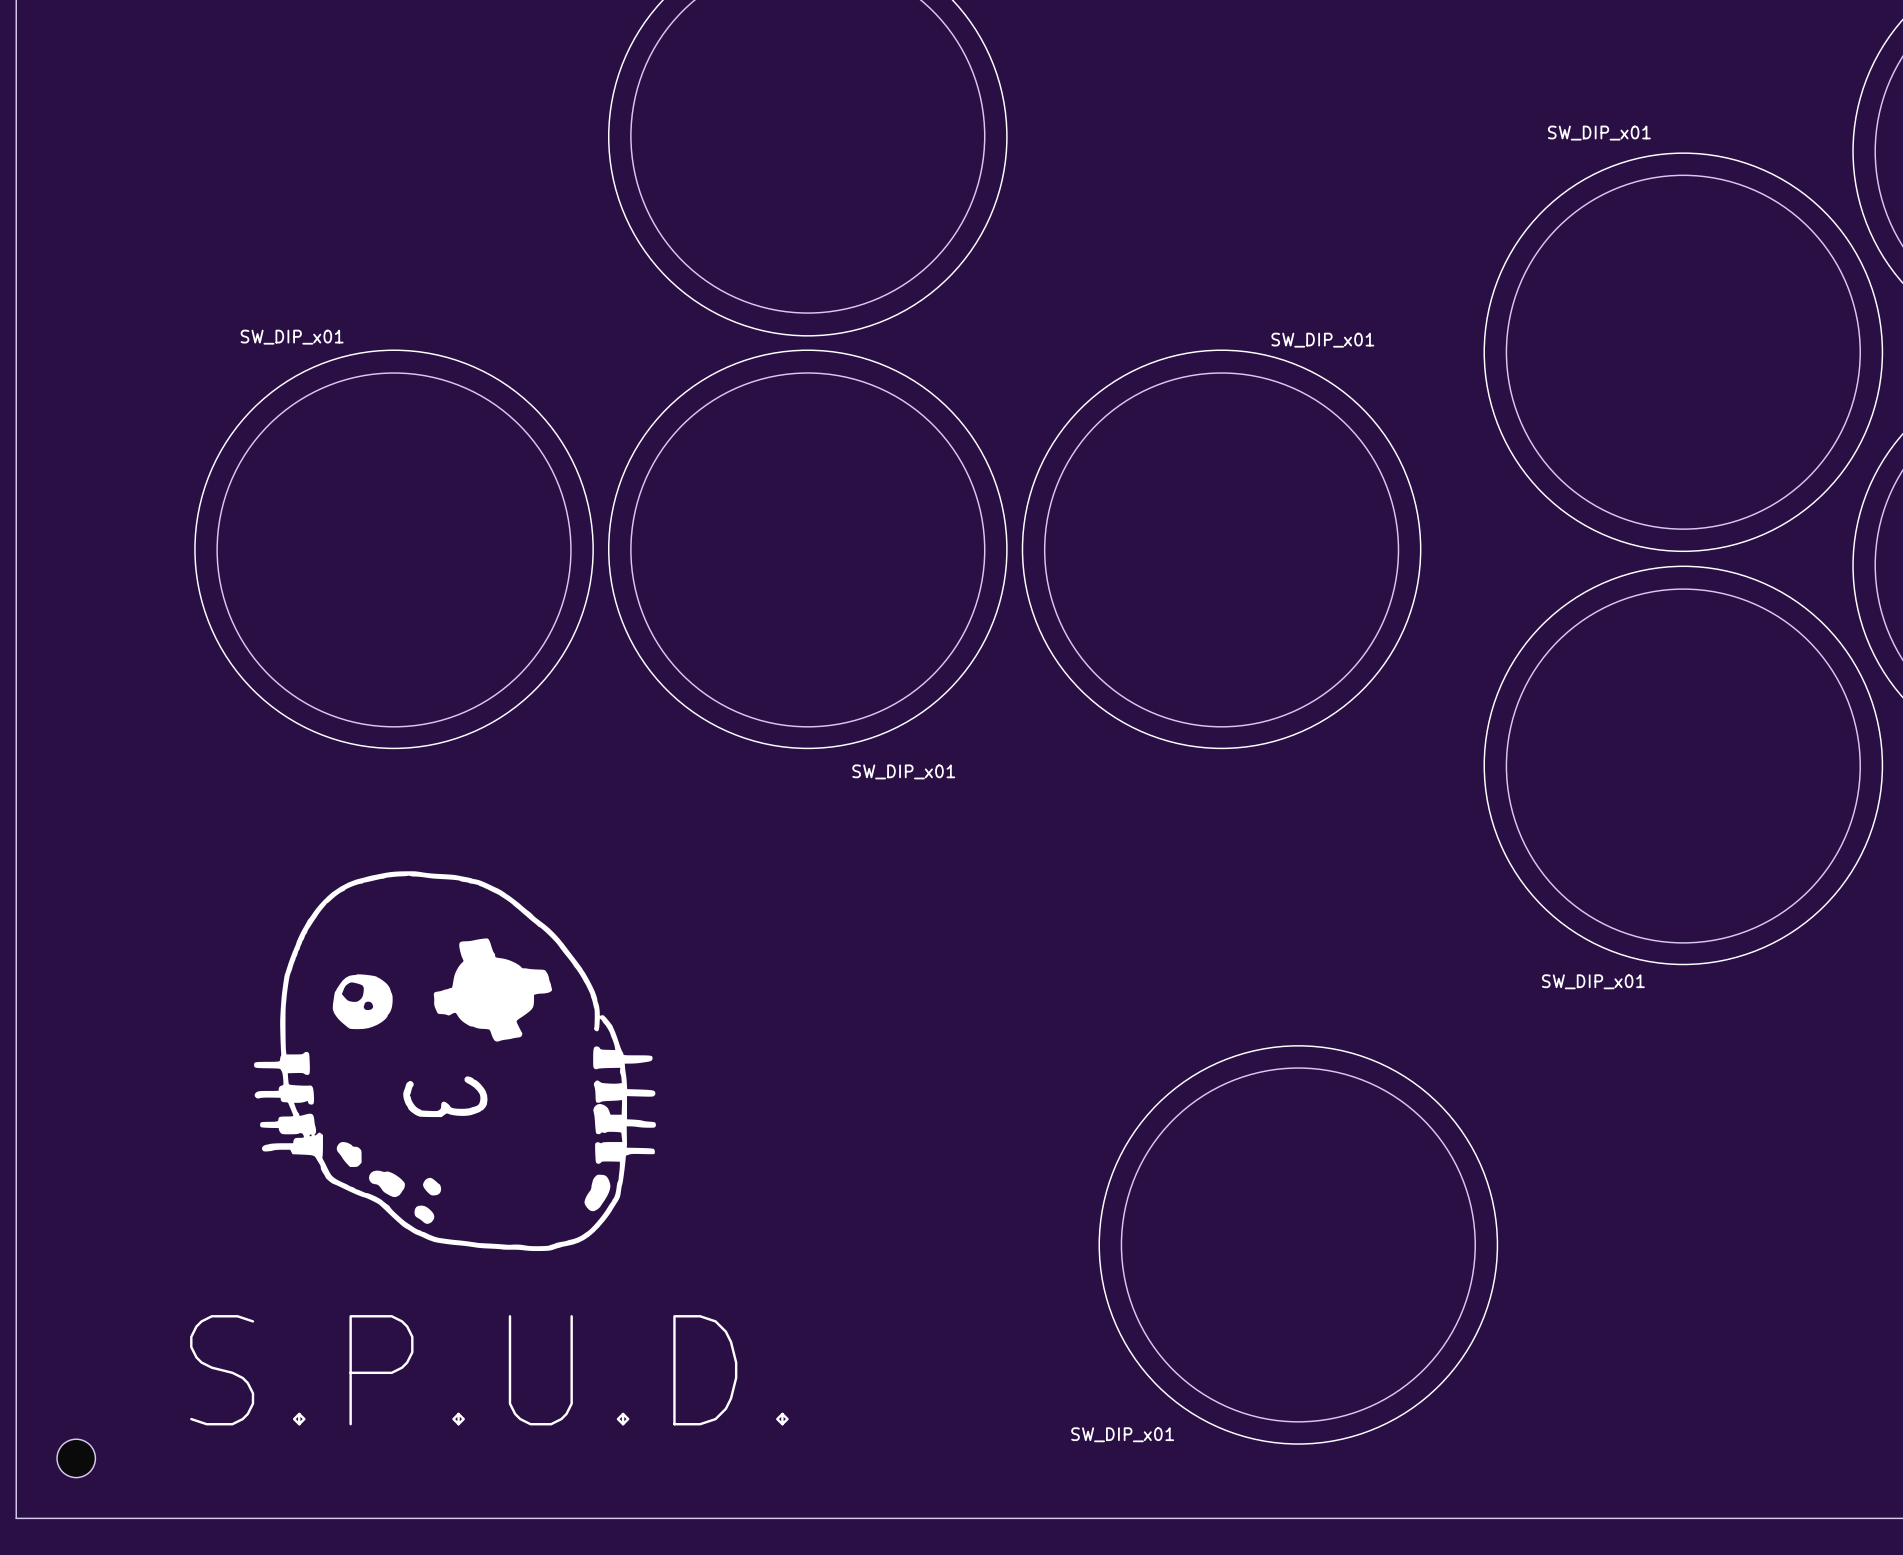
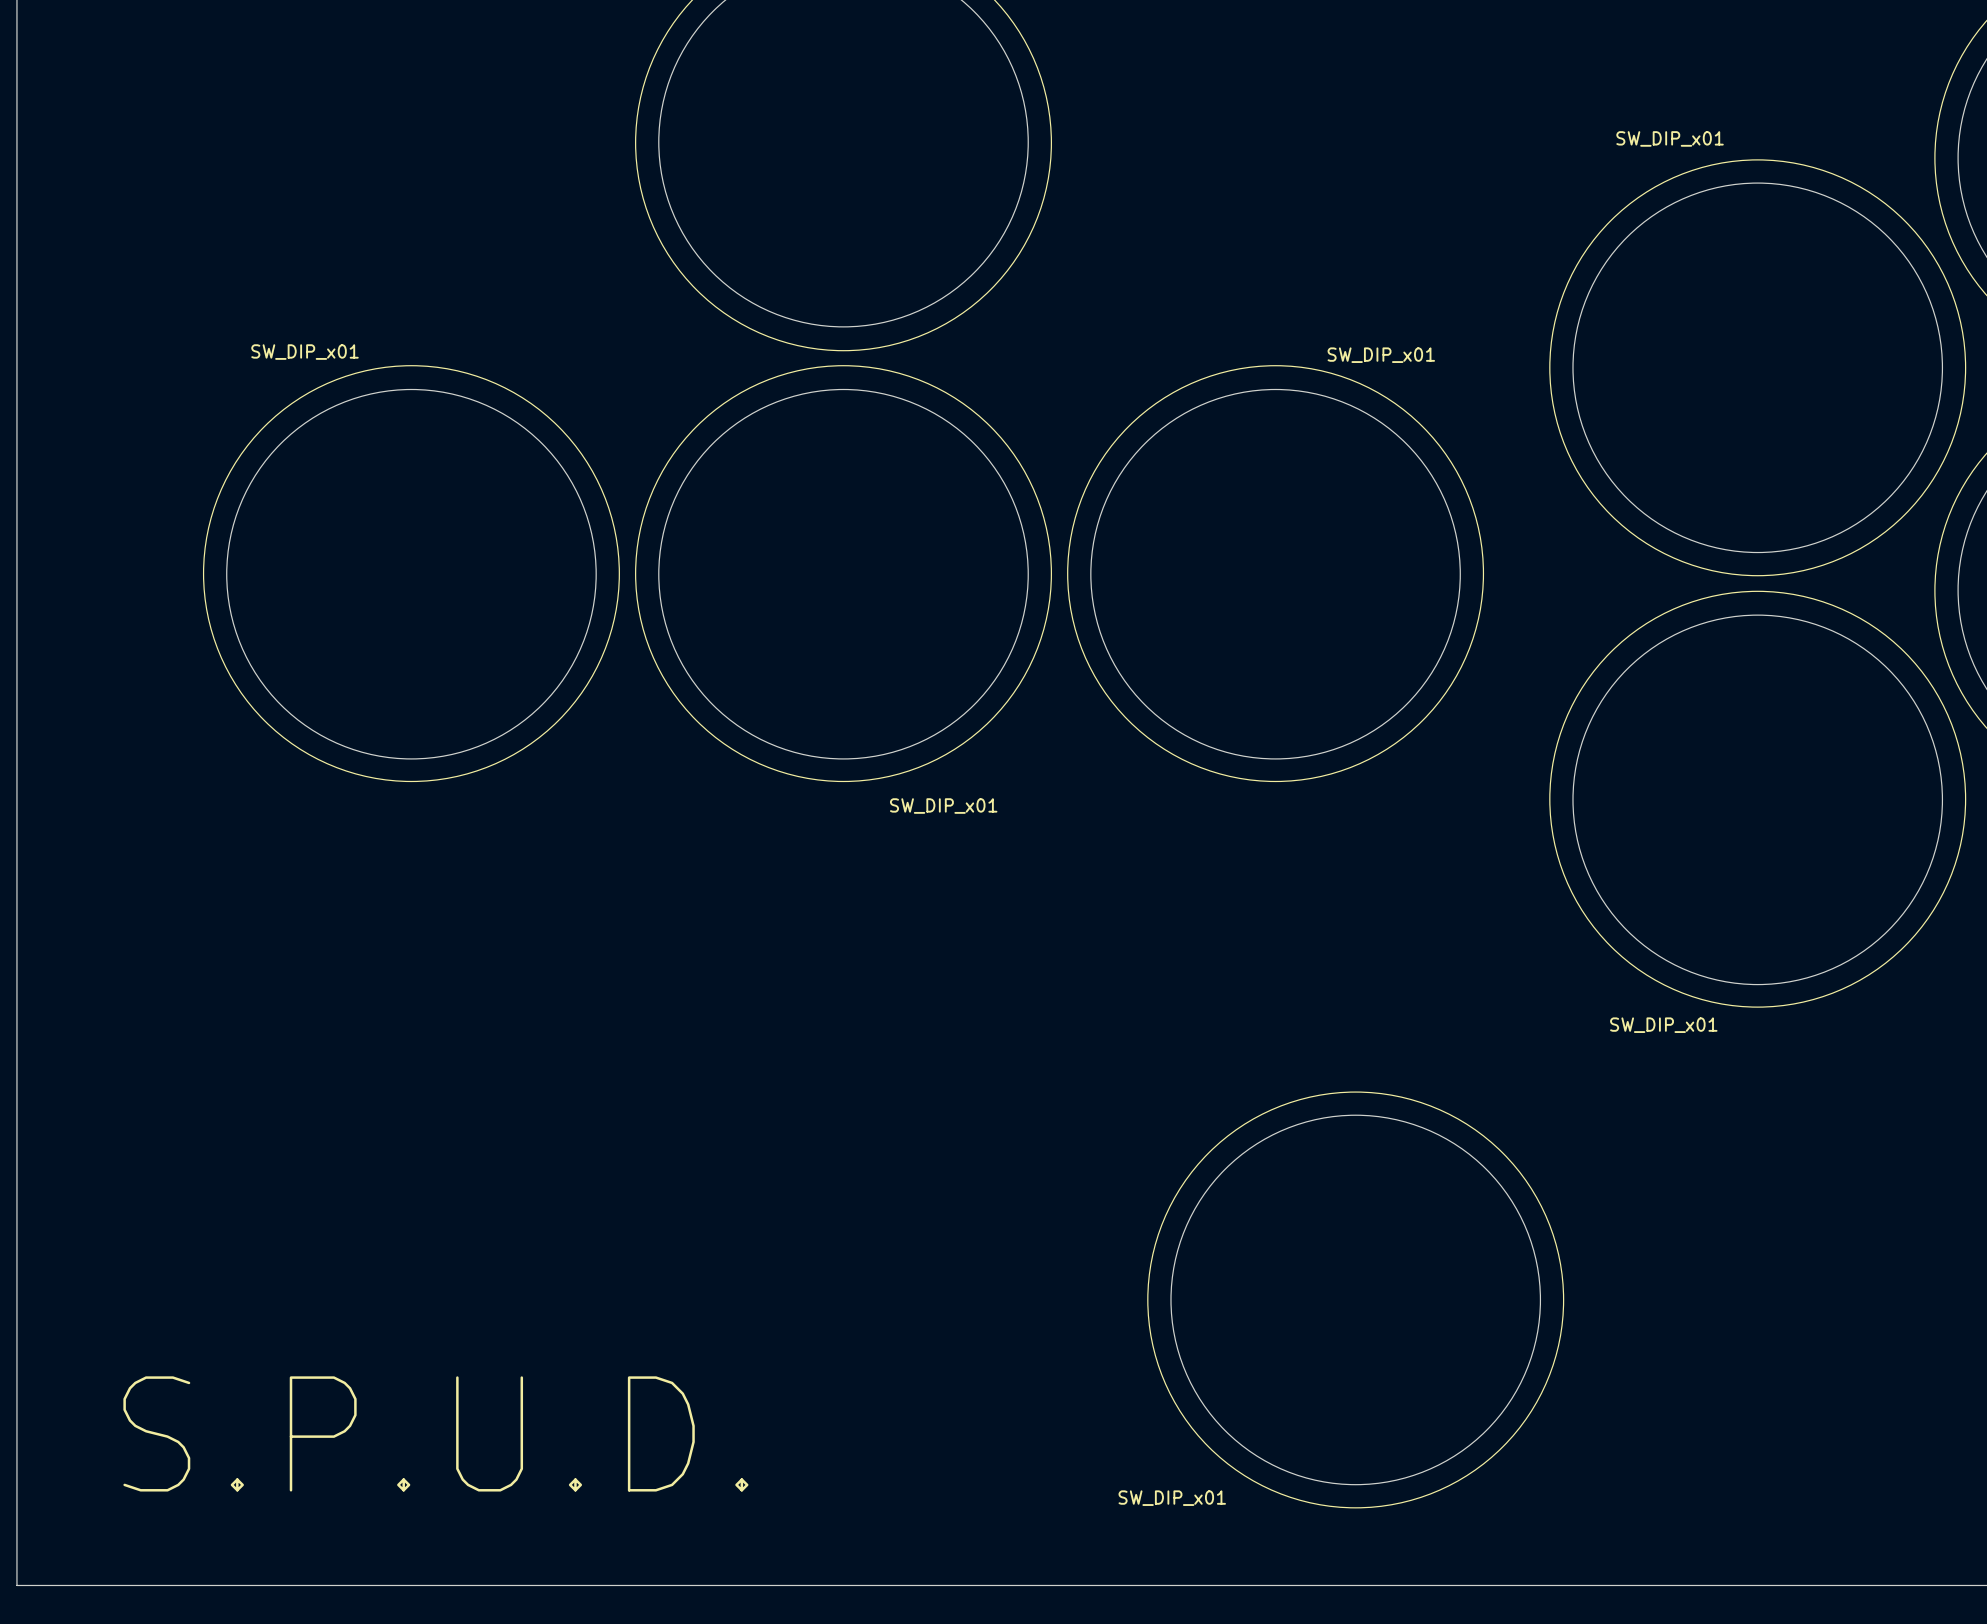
drawing: [254, 871, 656, 1252] -> none
text position: S.P.U.D. (489, 1370) -> S.P.U.D. (435, 1433)
part: (76, 1458) -> none

